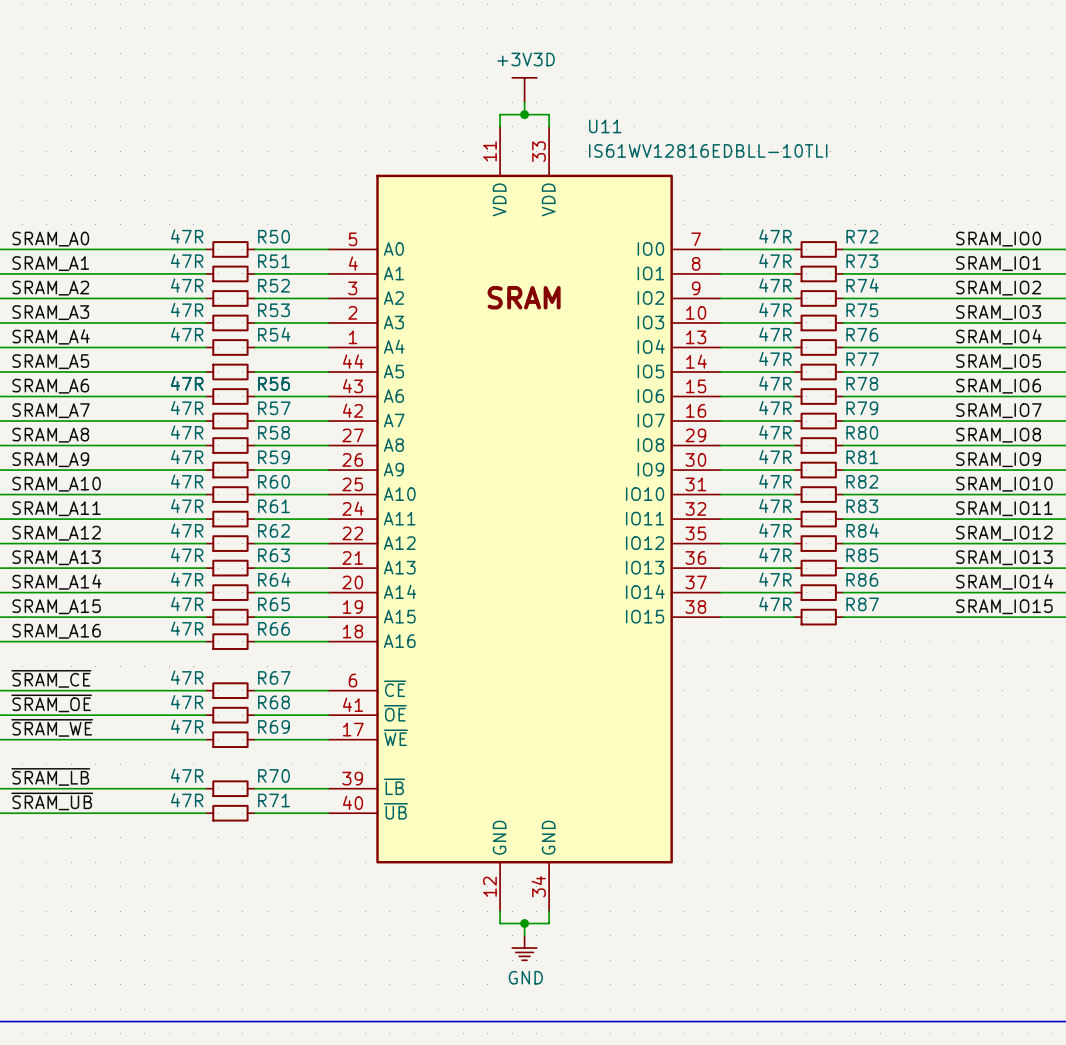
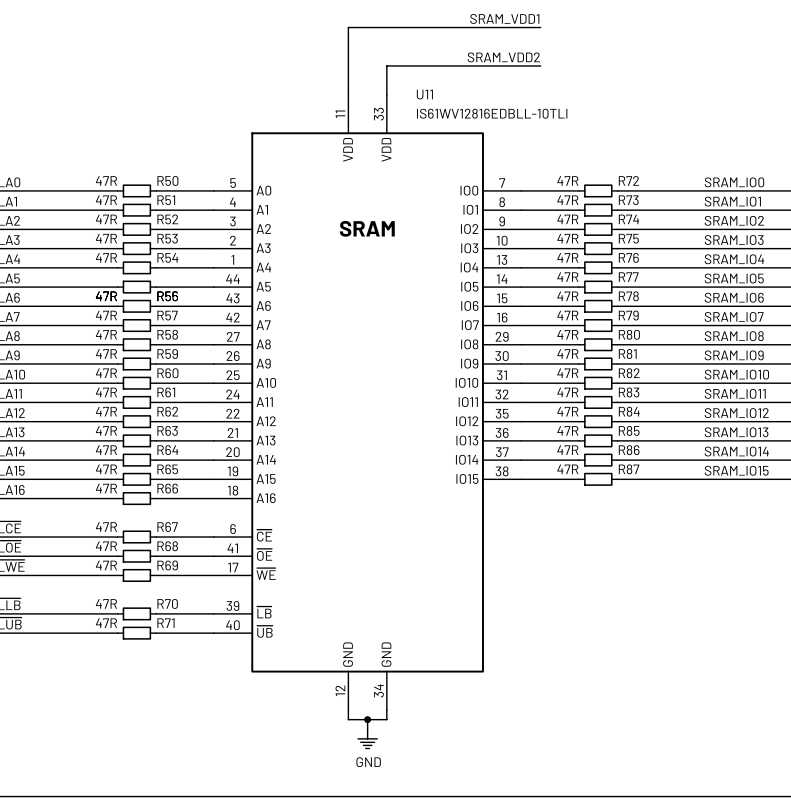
label: none -> SRAM_VDD1 (504, 18)
label: none -> SRAM_VDD2 (503, 57)
power symbol: +3V3D (524, 90) -> none
wire: none -> (540, 65) (386, 65) (386, 85)
wire: (524, 102) (524, 114) -> none
wire: (500, 114) (549, 114) -> (348, 85) (348, 27) (540, 27)
junction: (524, 114) -> none

